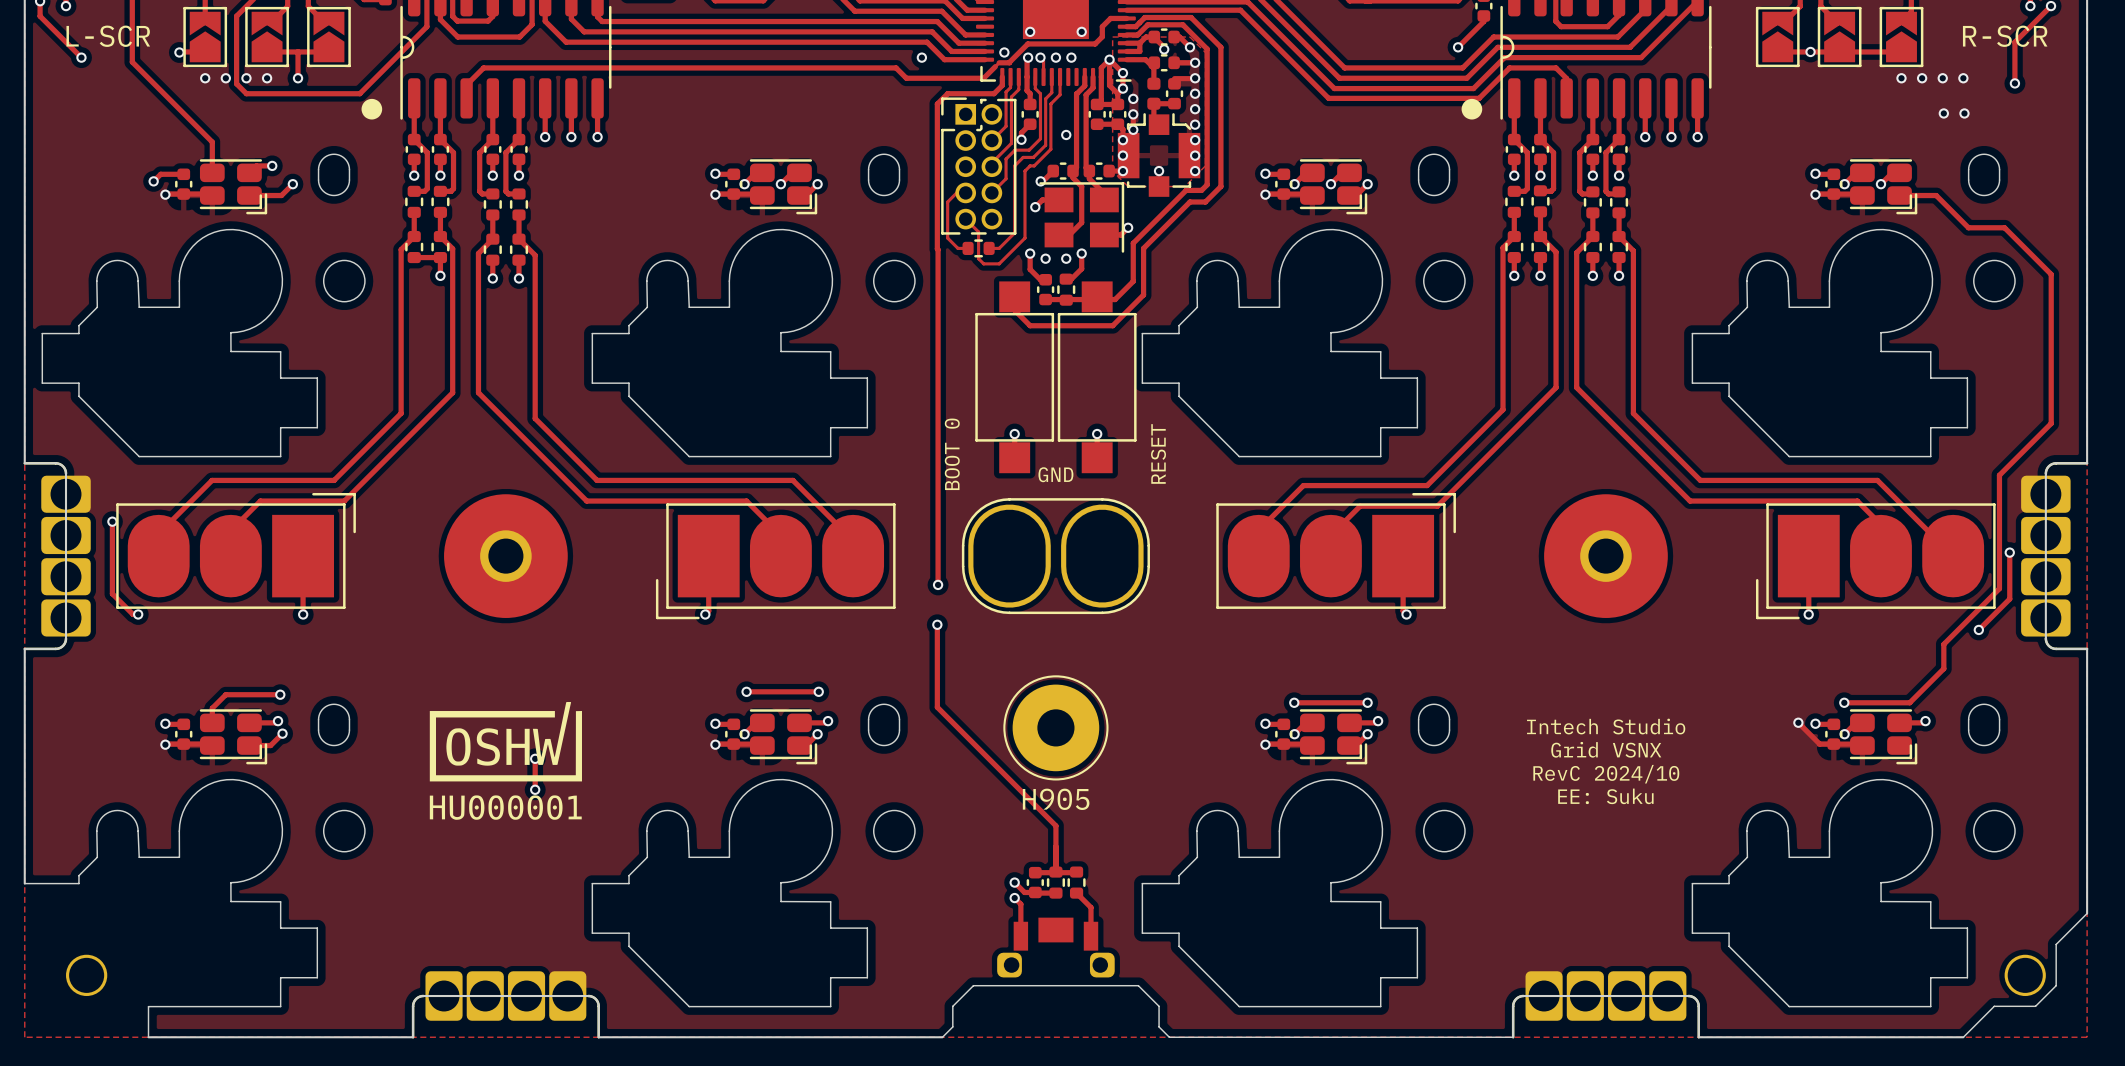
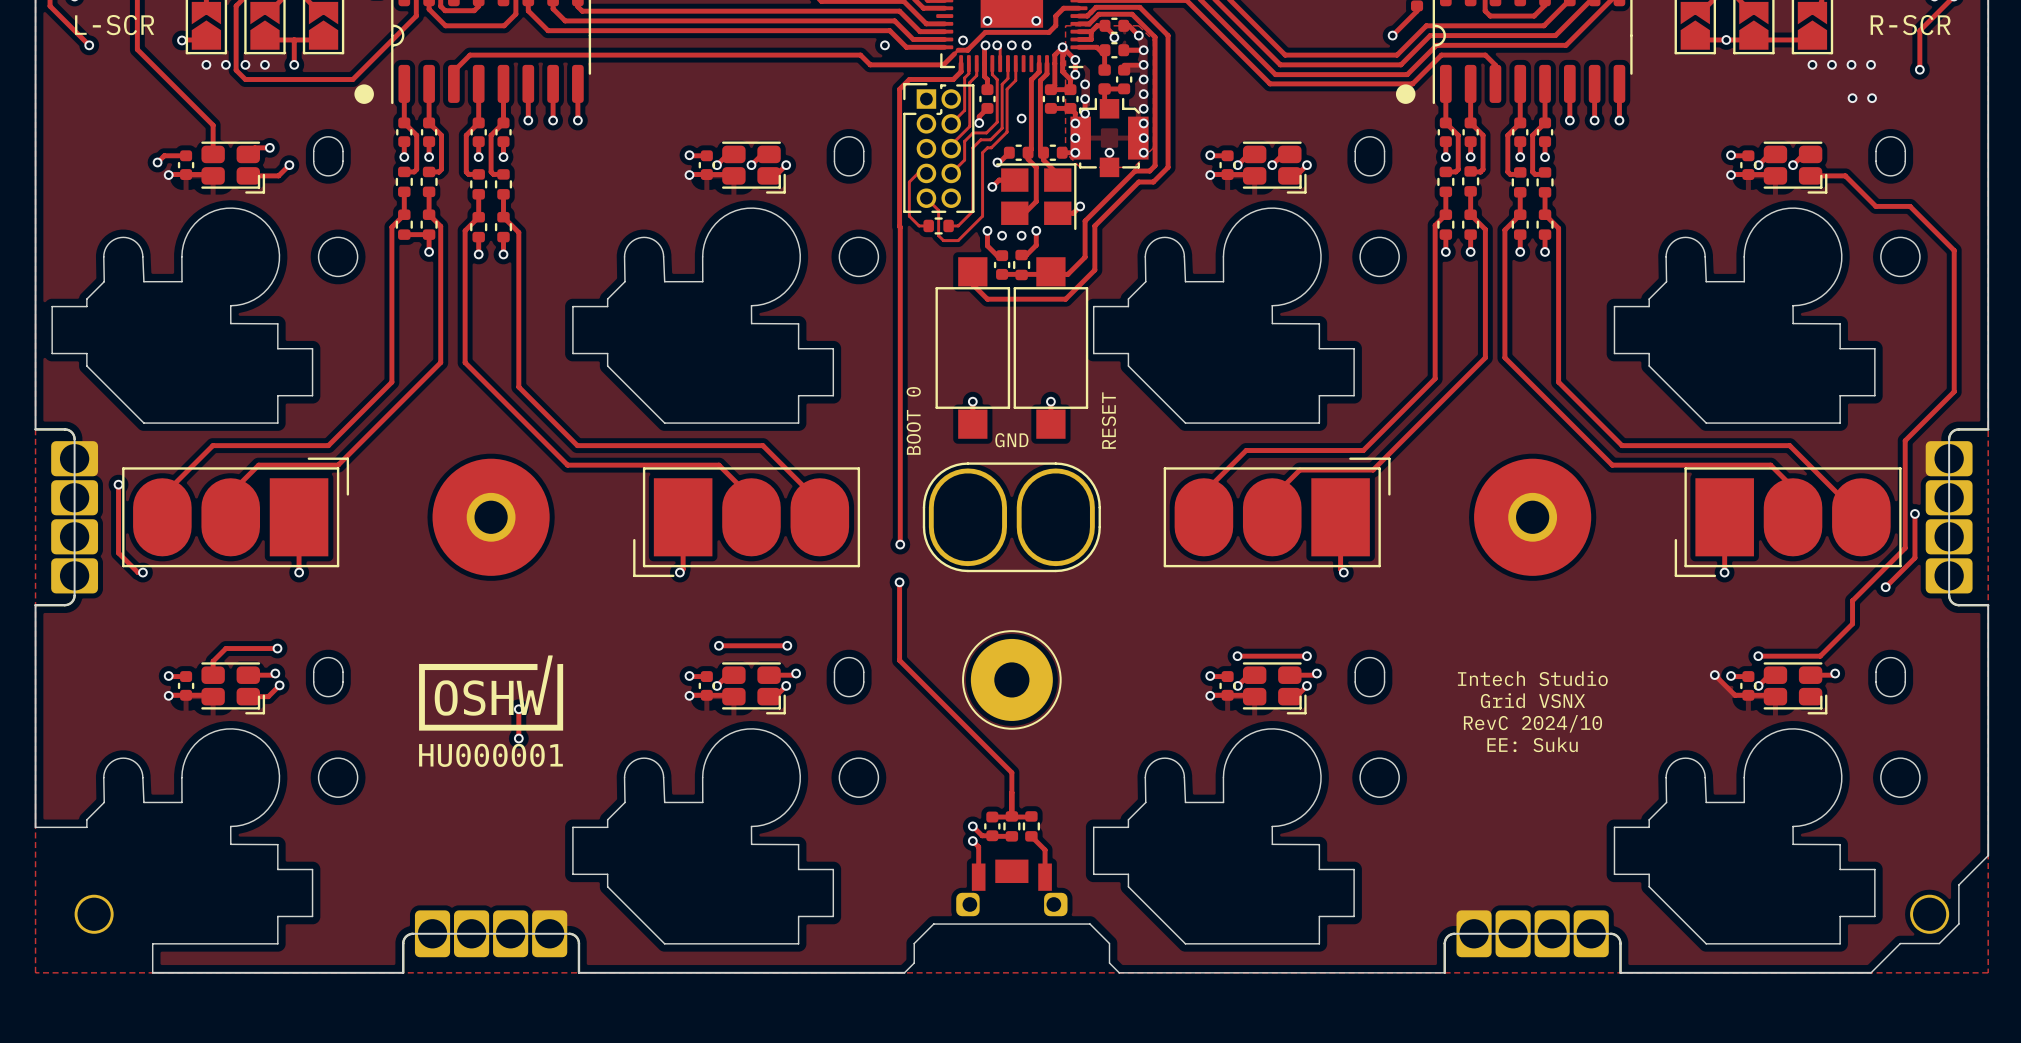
H905 name: H905 (1056, 799) -> none

